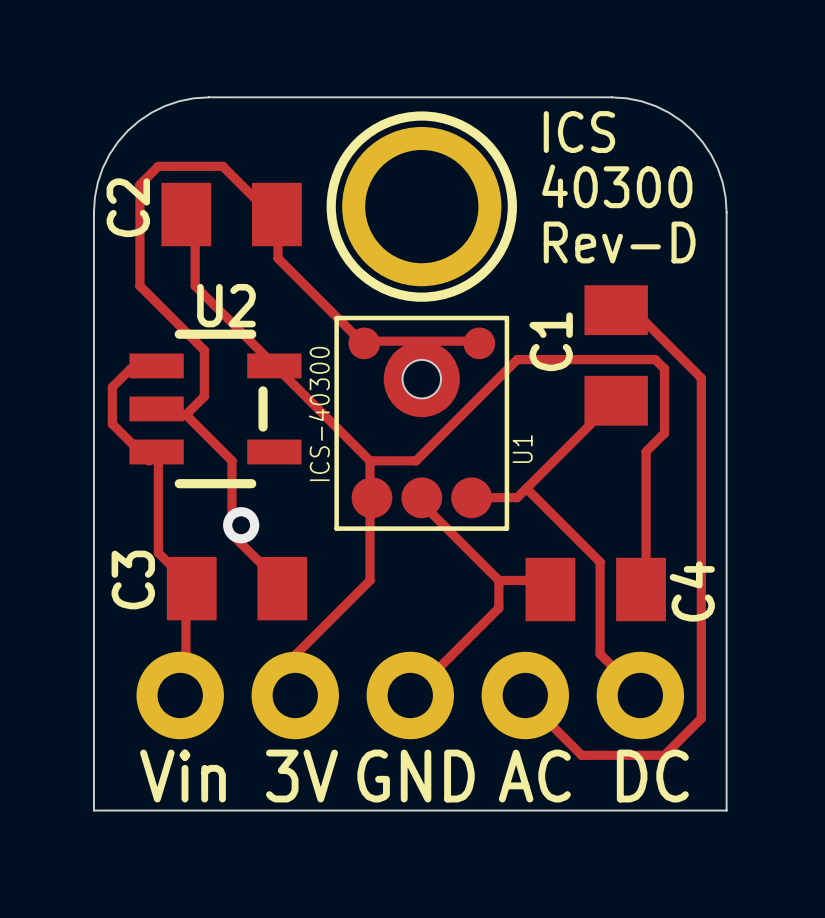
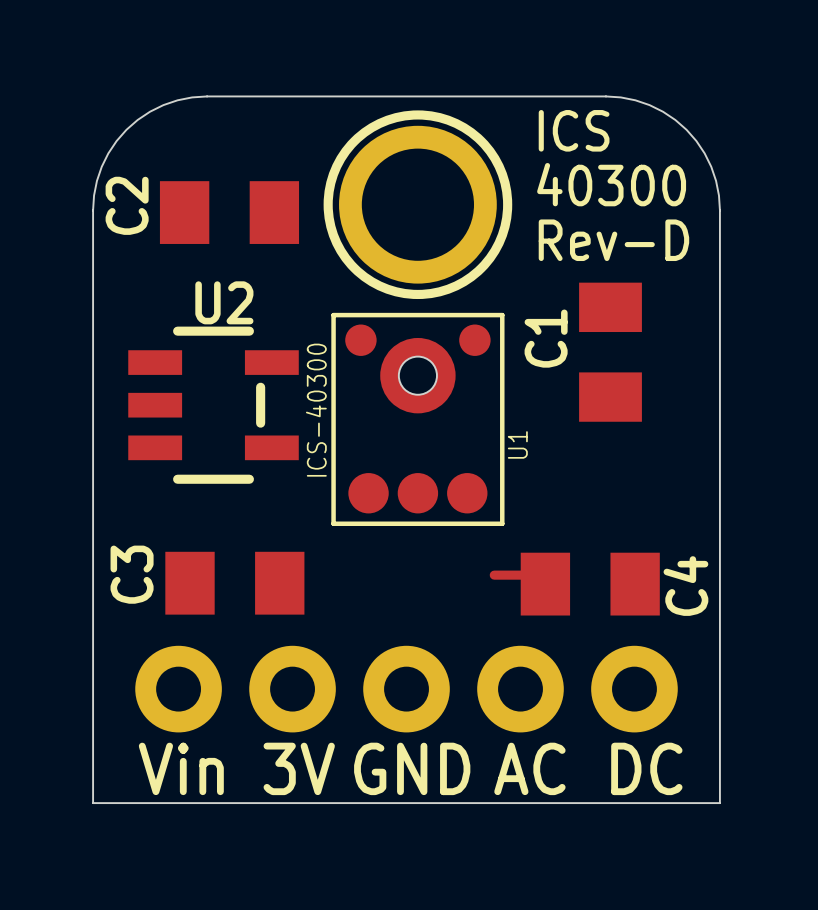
track: (186, 214) (195, 221) (195, 285) (370, 460) -> none
track: (616, 310) (618, 313) (636, 313) (701, 378) (701, 718) (664, 755) (581, 755) (526, 700) (525, 695) -> none
track: (479, 343) (471, 341) (370, 341) (364, 343) (277, 258) (276, 214) (268, 212) (222, 166) (158, 166) (139, 184) (139, 285) (204, 350) (204, 396) (185, 414) -> none
track: (156, 365) (149, 368) (130, 368) (112, 387) (112, 424) (149, 460) (156, 451) (158, 460) (158, 552) (191, 588) (185, 589) (185, 690) (180, 695) -> none
track: (616, 400) (517, 497) (471, 497) -> none
track: (185, 414) (231, 460) (231, 534) (277, 580) (282, 588) -> none
track: (370, 460) (370, 497) (371, 497) (370, 506) (370, 580) (296, 654) (295, 695) -> none
track: (370, 460) (416, 460) (517, 359) (655, 359) (664, 368) (664, 433) (646, 451) (646, 580) (641, 589) -> none
track: (526, 488) (600, 562) (600, 654) (640, 695) -> none
track: (421, 497) (425, 506) (498, 580) (498, 608) (410, 695) -> none
via: (241, 525) -> none

